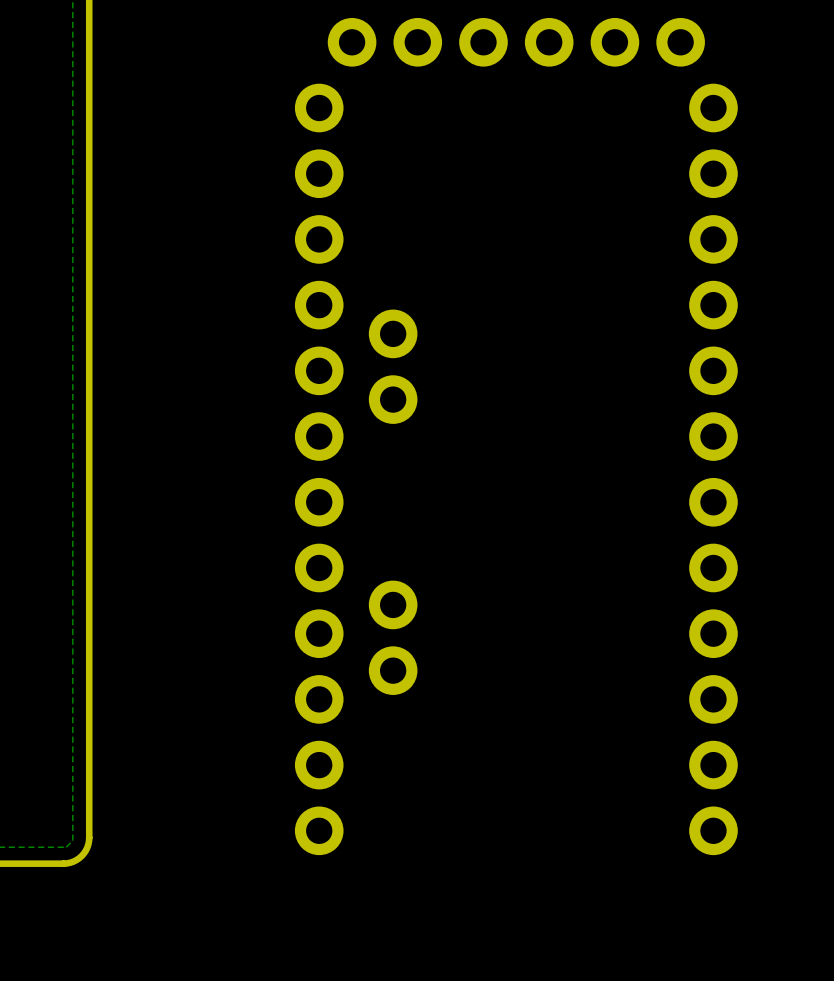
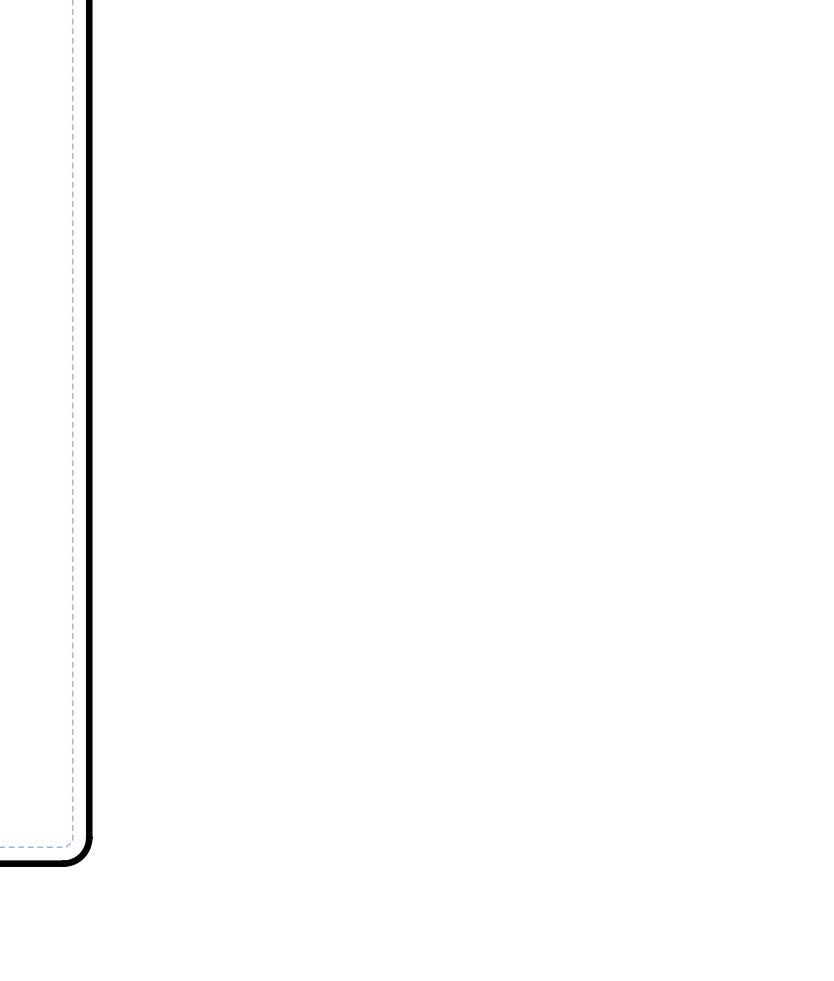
part: (516, 436) -> none

